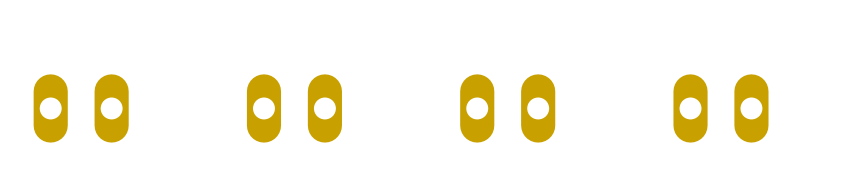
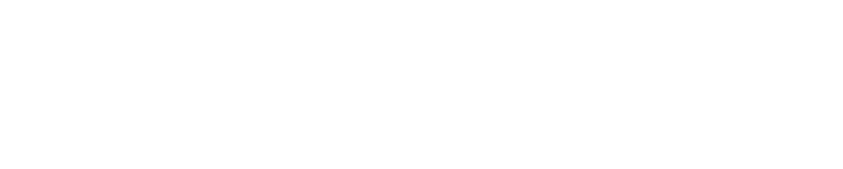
part: (81, 108) -> none
part: (294, 108) -> none
part: (507, 108) -> none
part: (720, 108) -> none

